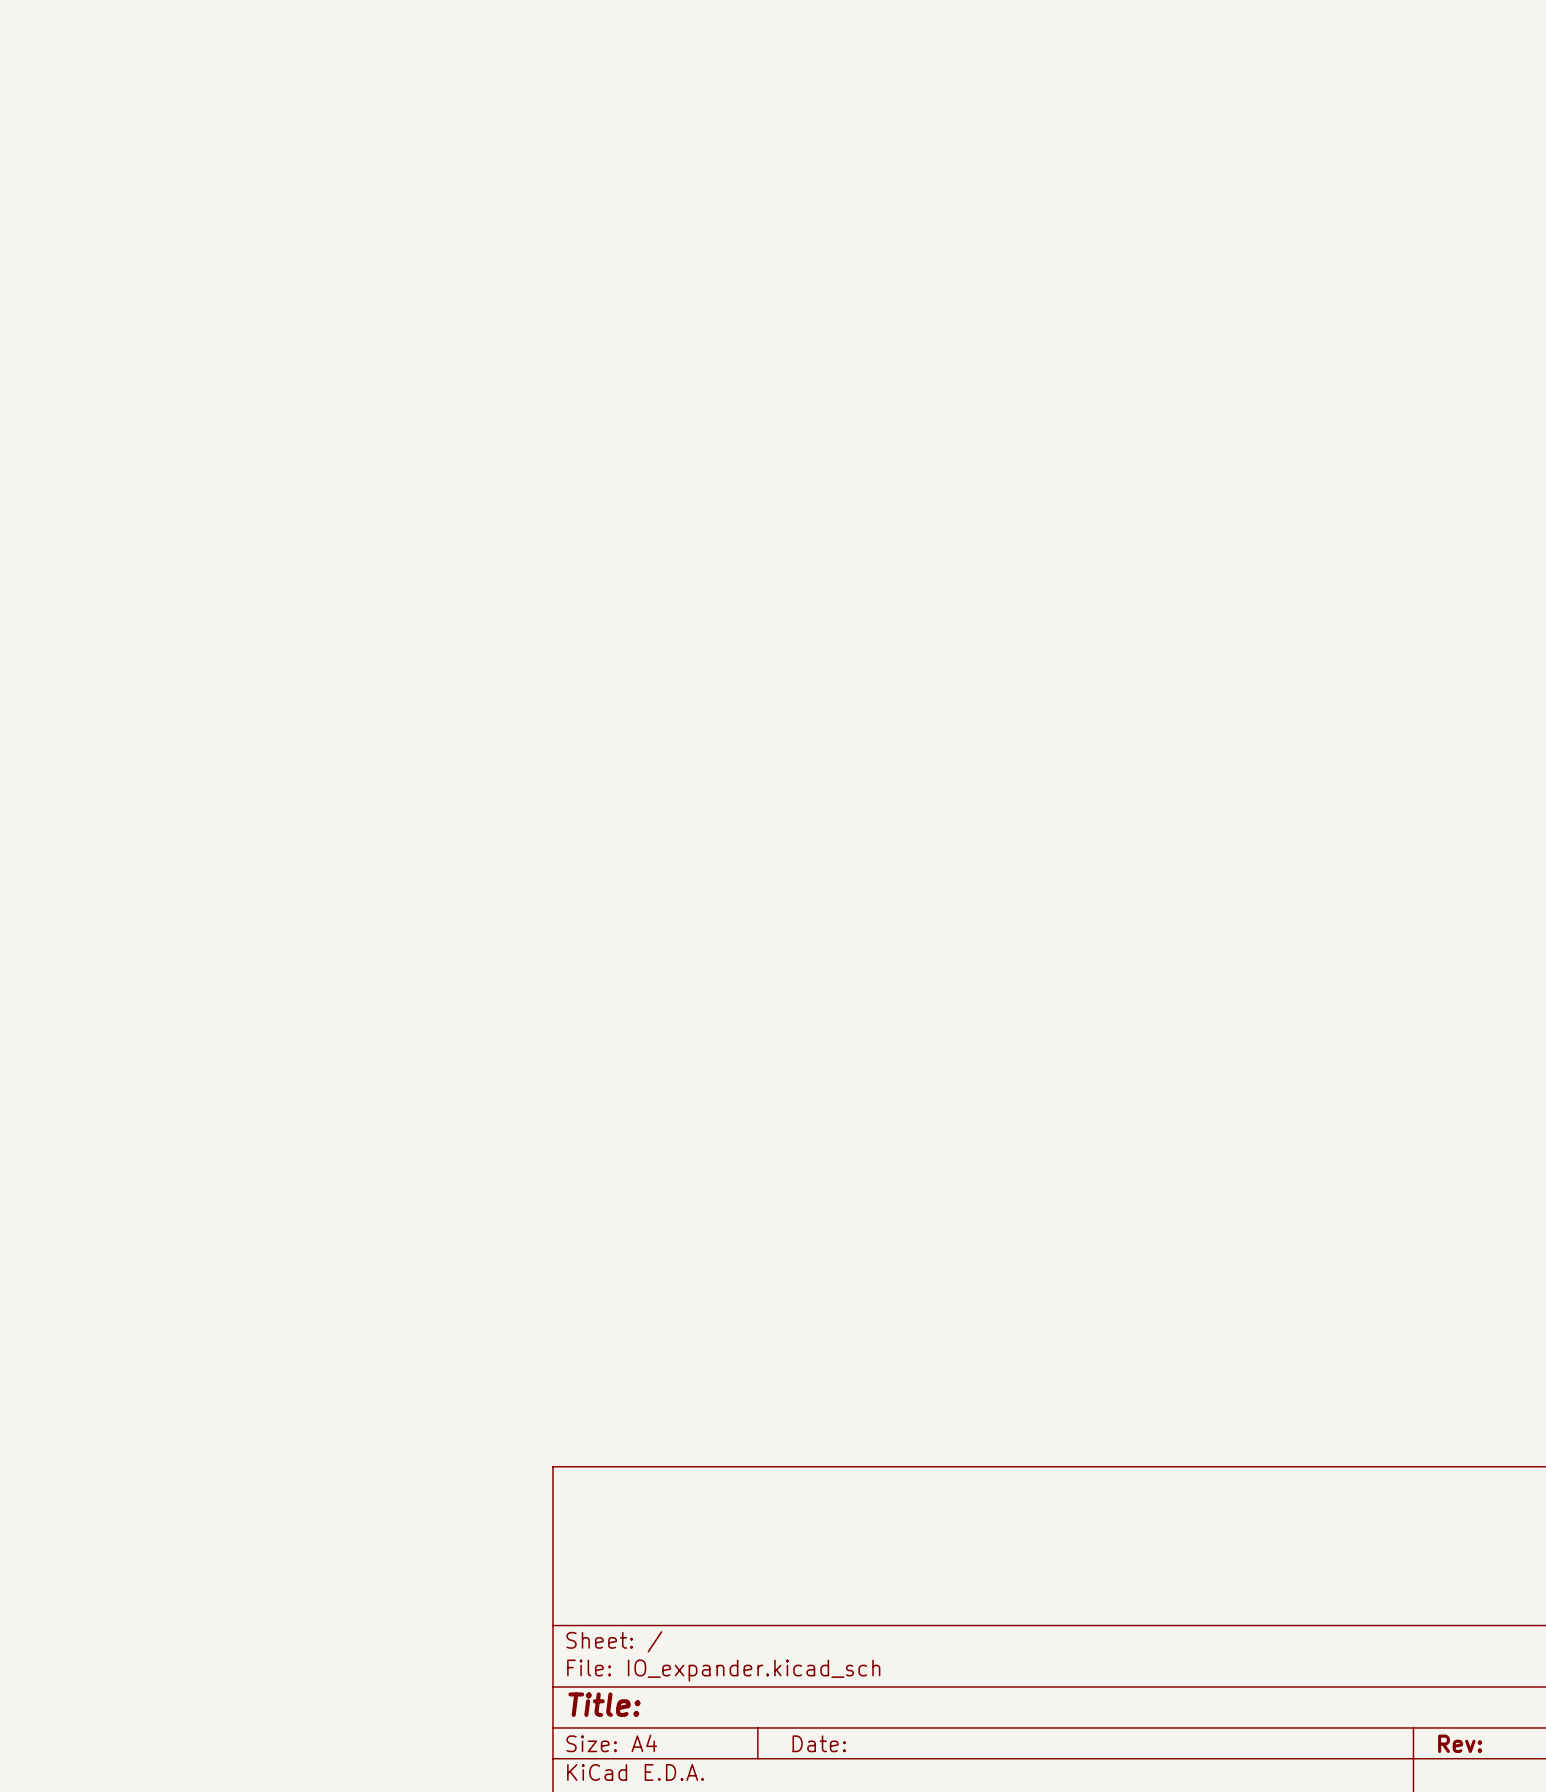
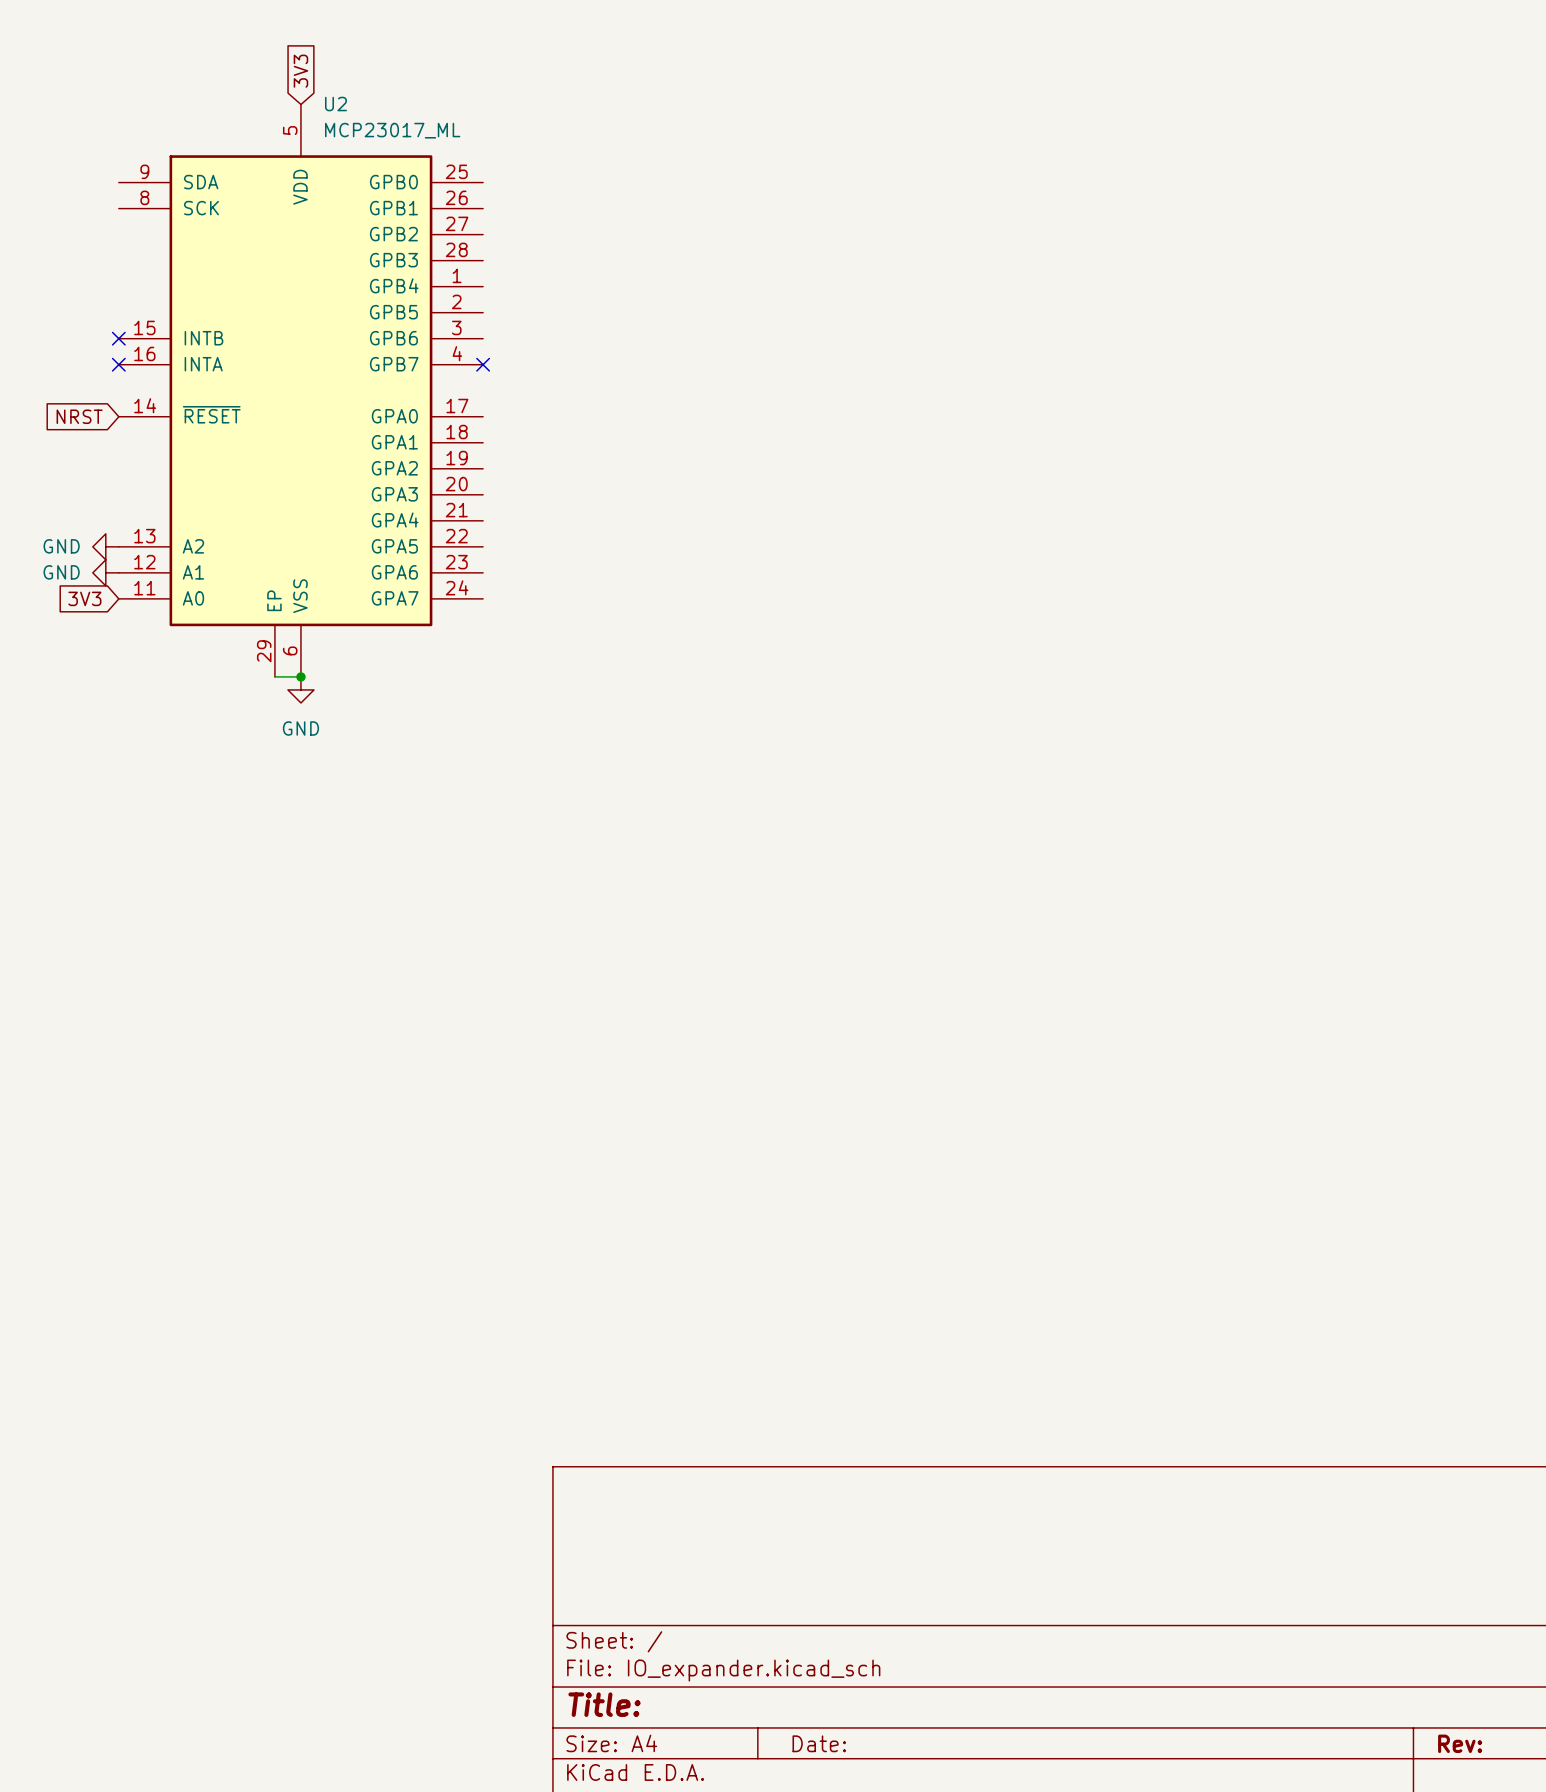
global label: none -> 3V3 (300, 71)
no-connect mark: none -> (118, 338)
no-connect mark: none -> (118, 364)
no-connect mark: none -> (483, 364)
U2: none -> MCP23017_ML (300, 390)
global label: none -> NRST (79, 416)
power symbol: none -> GND (105, 546)
power symbol: none -> GND (105, 572)
global label: none -> 3V3 (84, 598)
wire: none -> (274, 676) (300, 676)
junction: none -> (300, 676)
power symbol: none -> GND (300, 689)

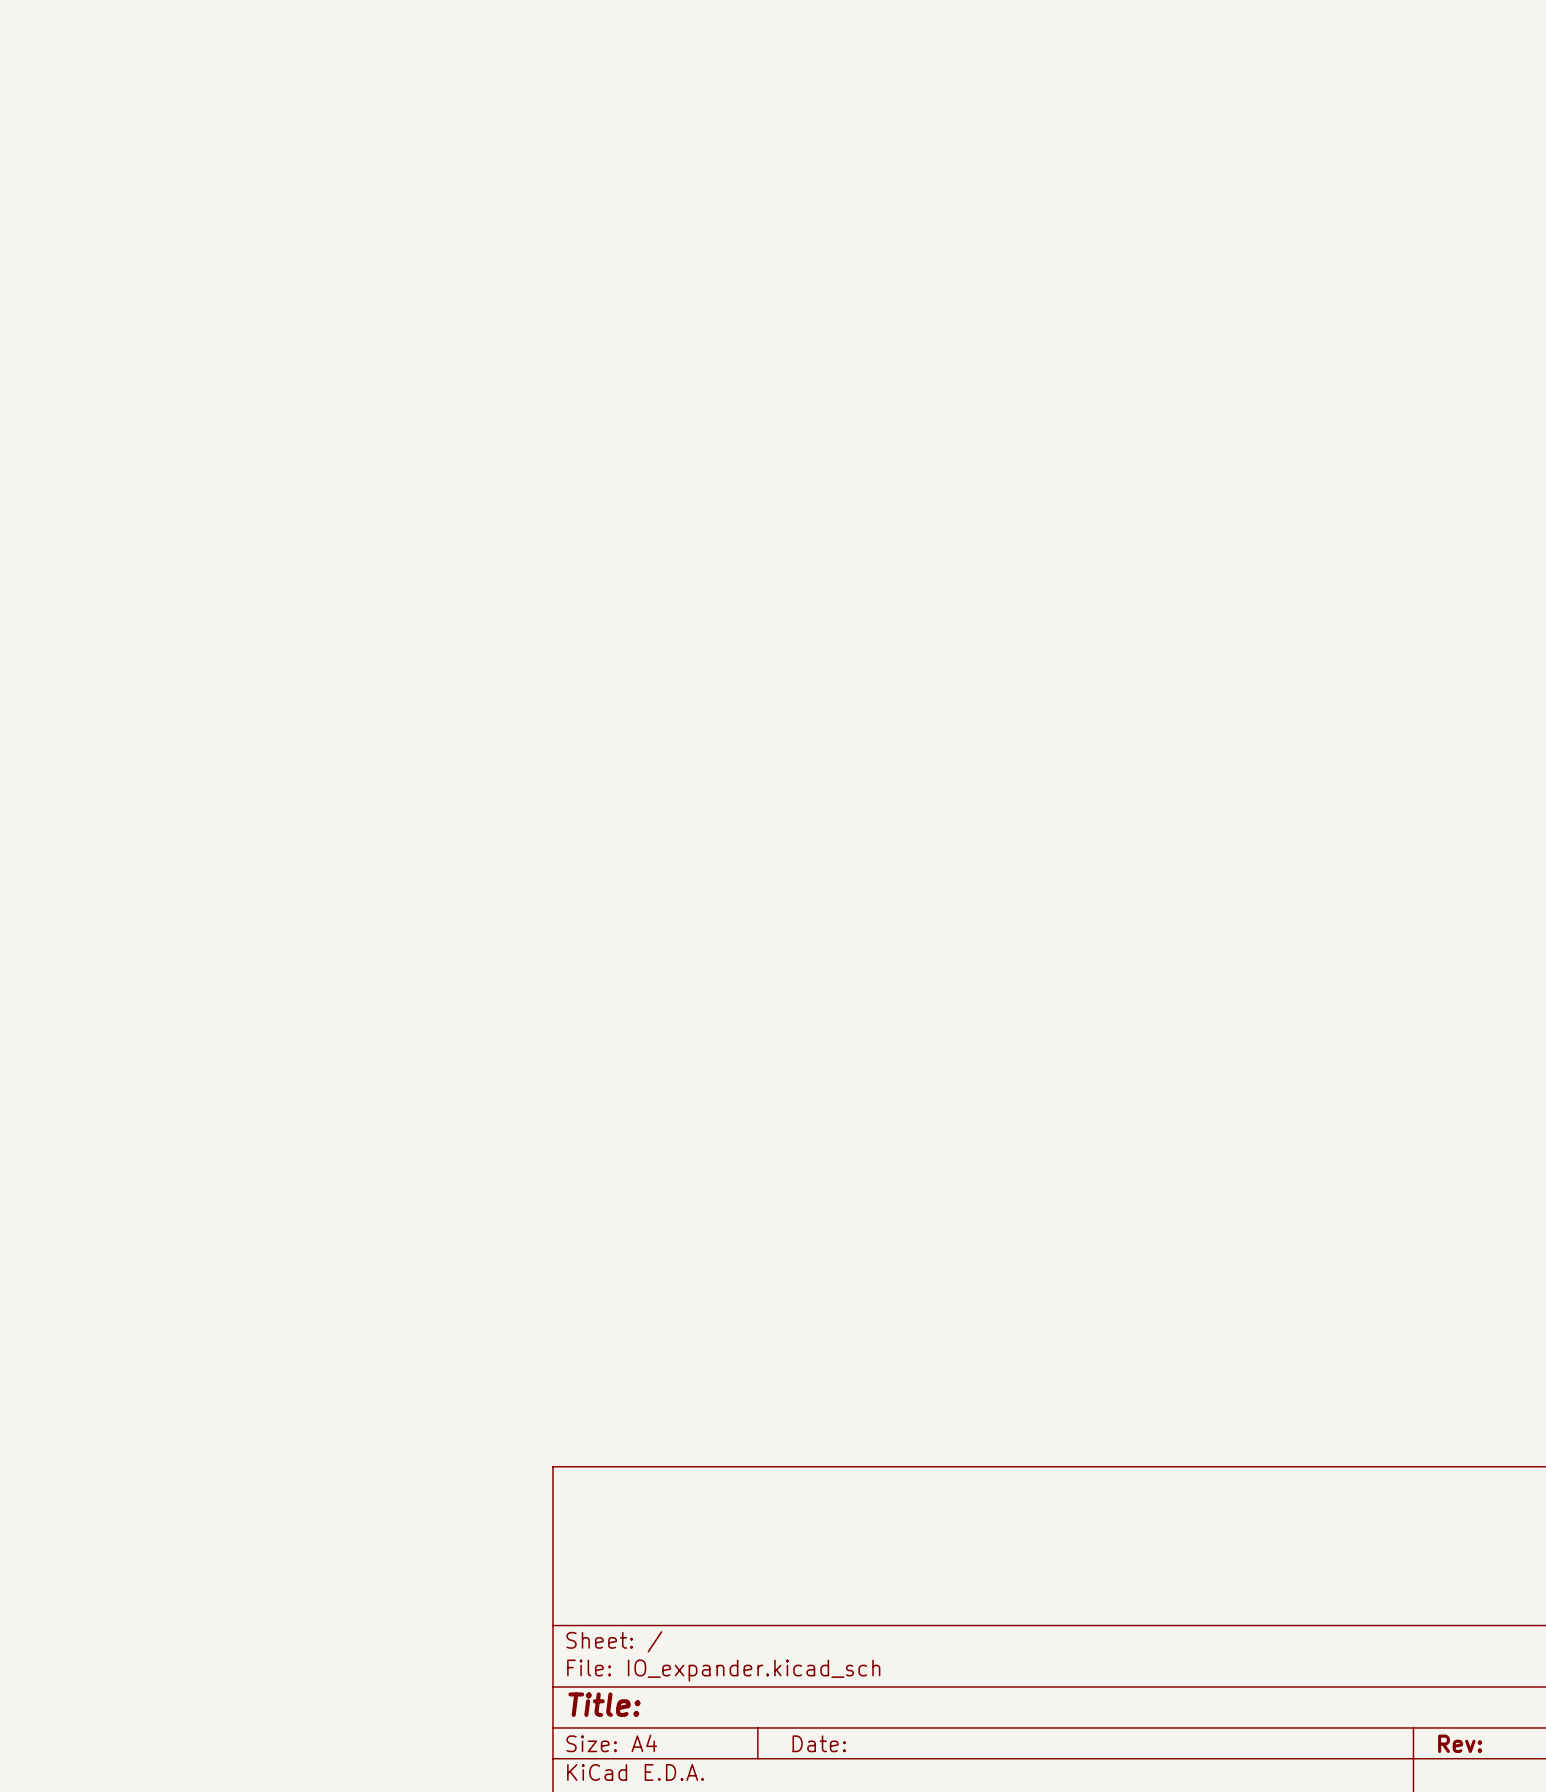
global label: 3V3 (300, 71) -> none
no-connect mark: (118, 338) -> none
no-connect mark: (118, 364) -> none
no-connect mark: (483, 364) -> none
U2: MCP23017_ML (300, 390) -> none
global label: NRST (79, 416) -> none
power symbol: GND (105, 546) -> none
power symbol: GND (105, 572) -> none
global label: 3V3 (84, 598) -> none
wire: (274, 676) (300, 676) -> none
junction: (300, 676) -> none
power symbol: GND (300, 689) -> none

